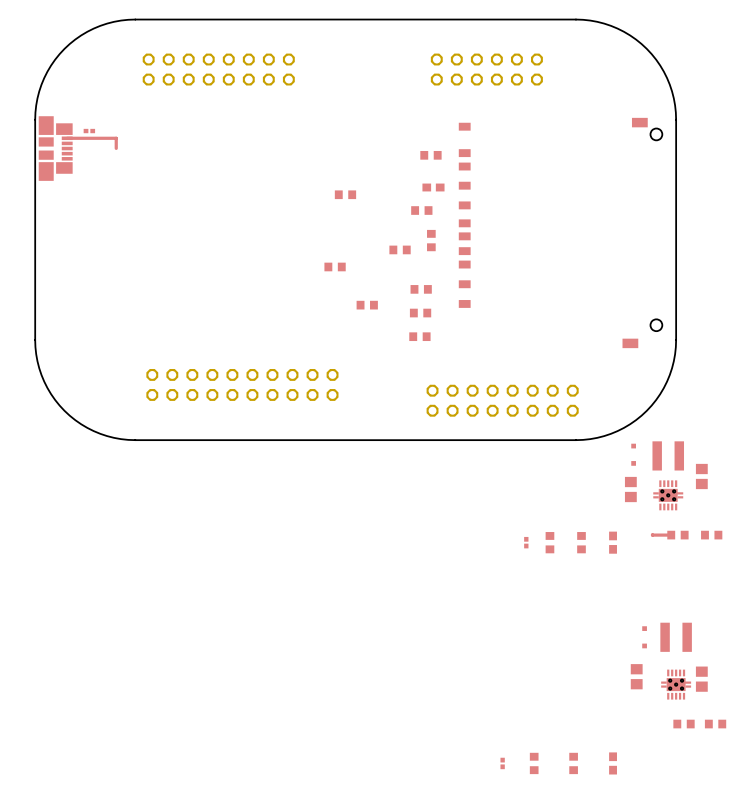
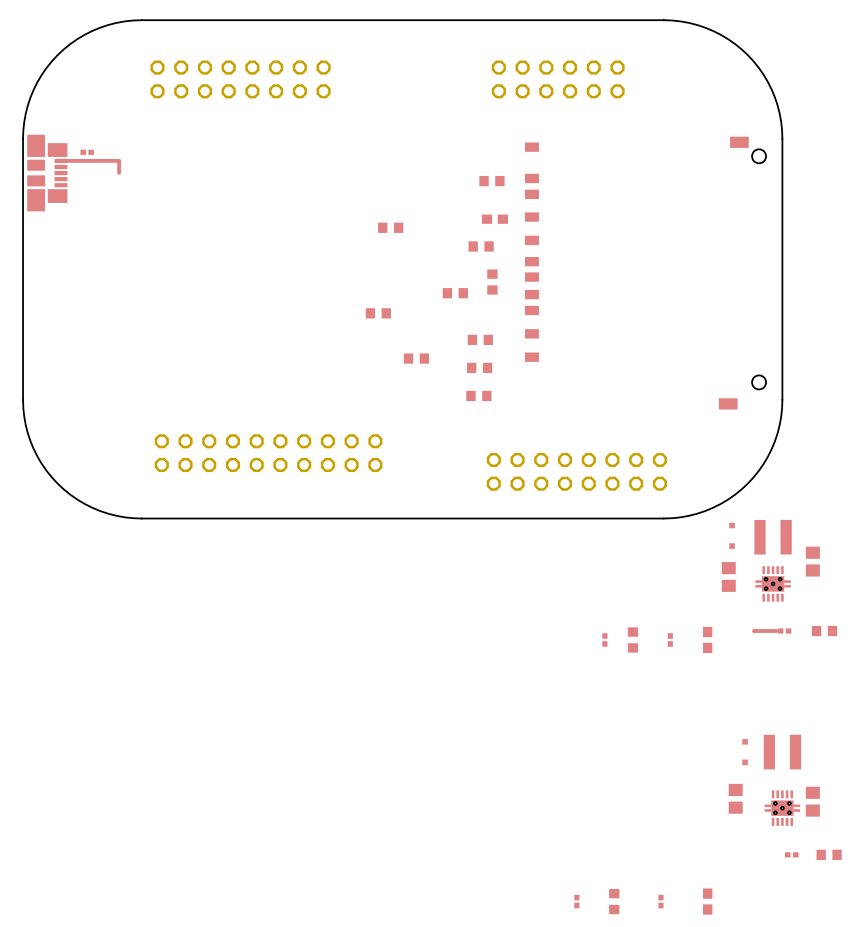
part footprint: [667, 530, 689, 540] -> [777, 628, 792, 634]
part footprint: [577, 532, 586, 554] -> [667, 633, 673, 647]
part footprint: [673, 719, 695, 729] -> [784, 852, 799, 858]
part footprint: [569, 752, 578, 775] -> [658, 894, 664, 909]

